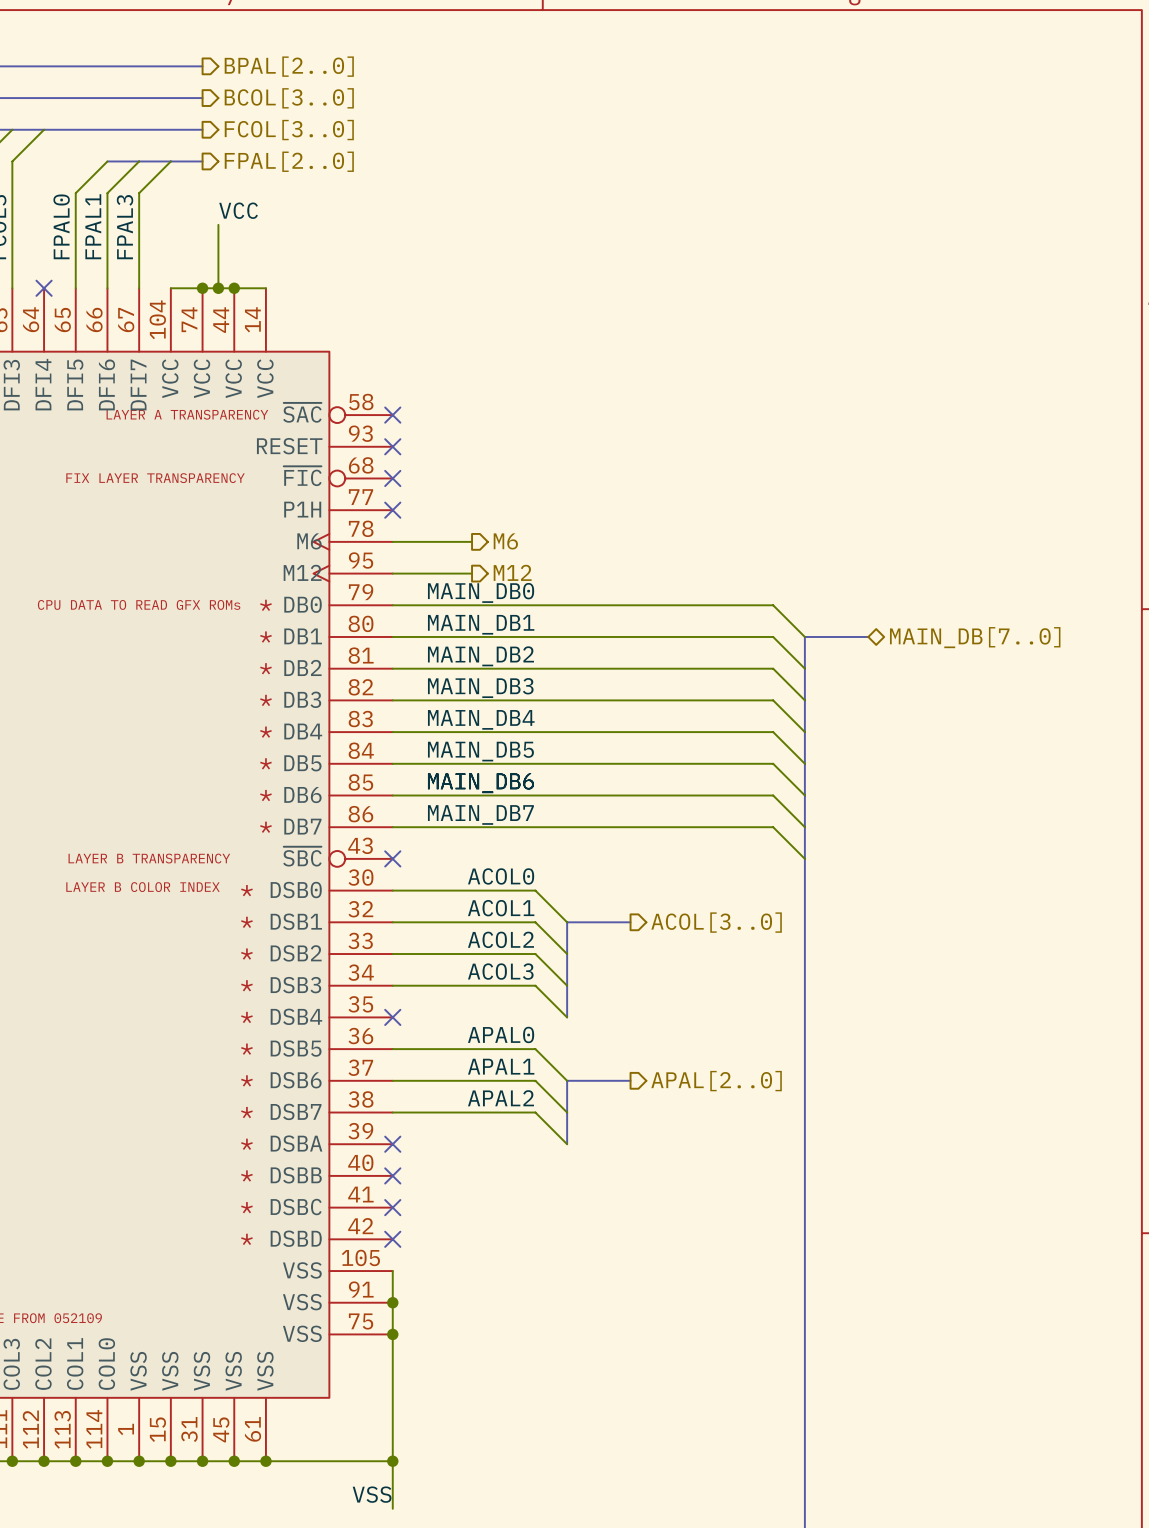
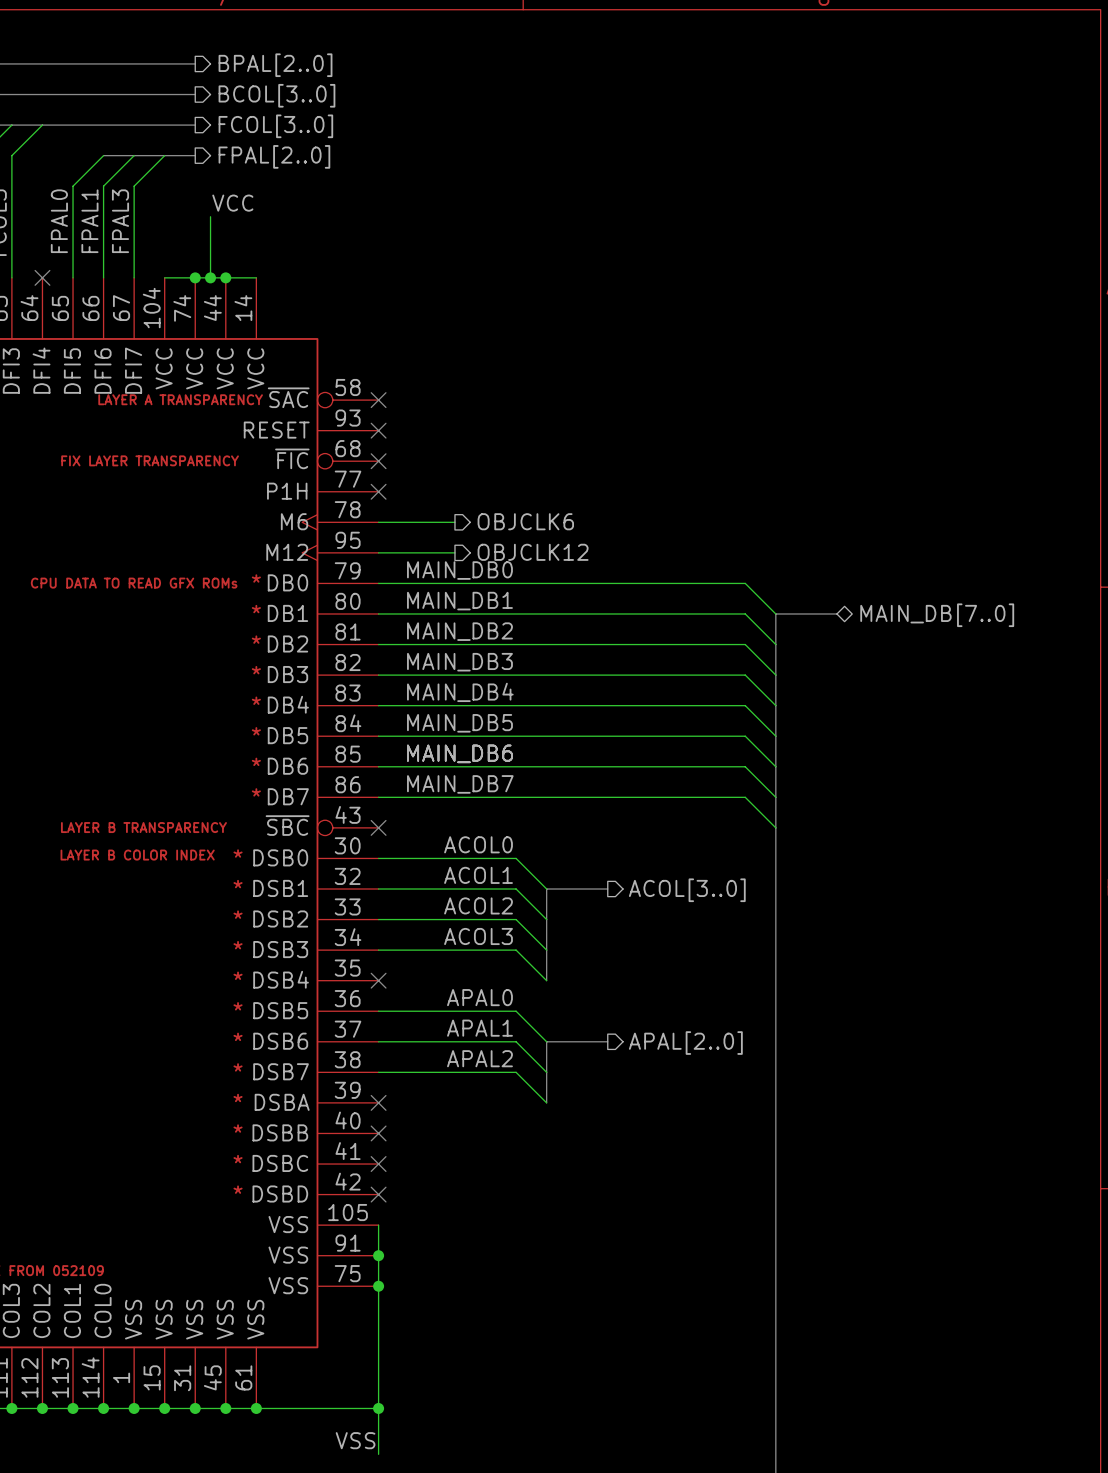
hierarchical label: M6 (505, 541) -> OBJCLK6 (525, 521)
hierarchical label: M12 (512, 572) -> OBJCLK12 (533, 552)

